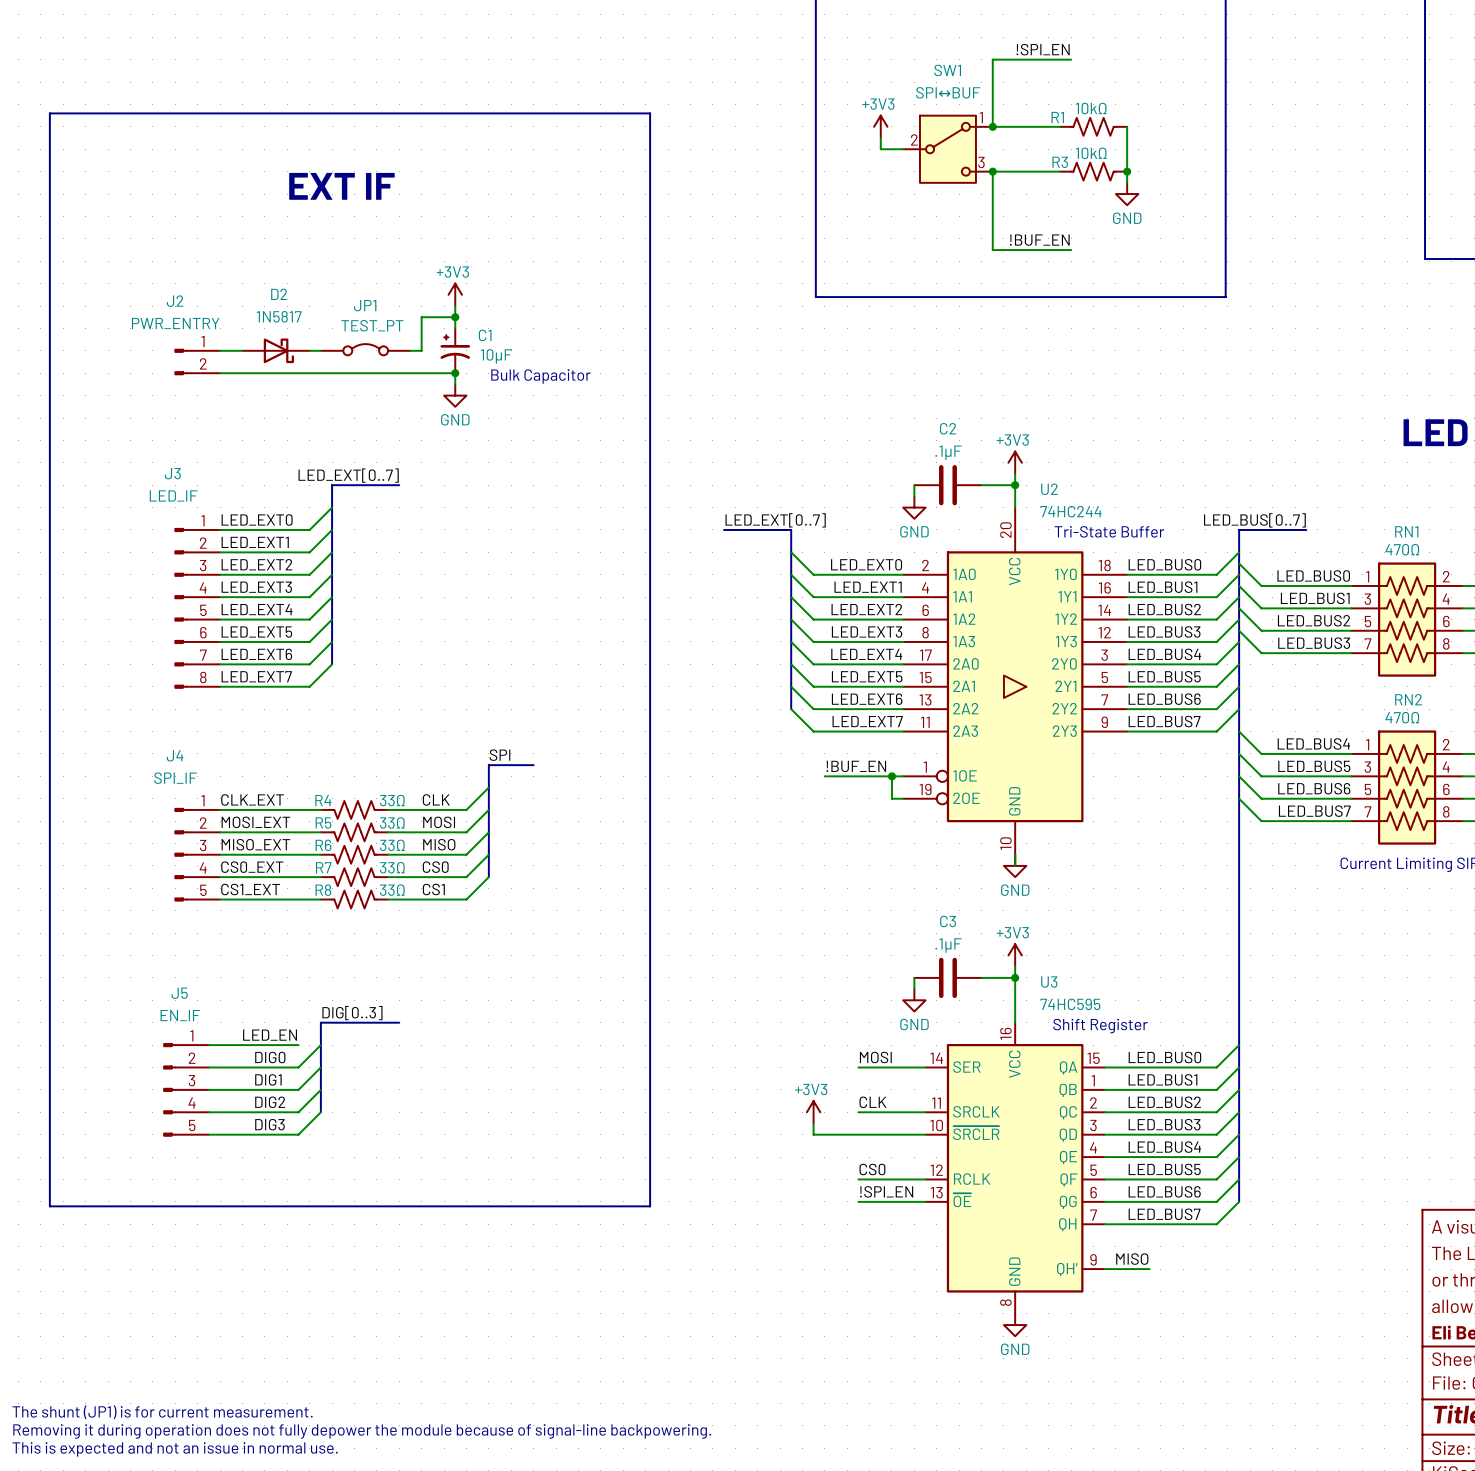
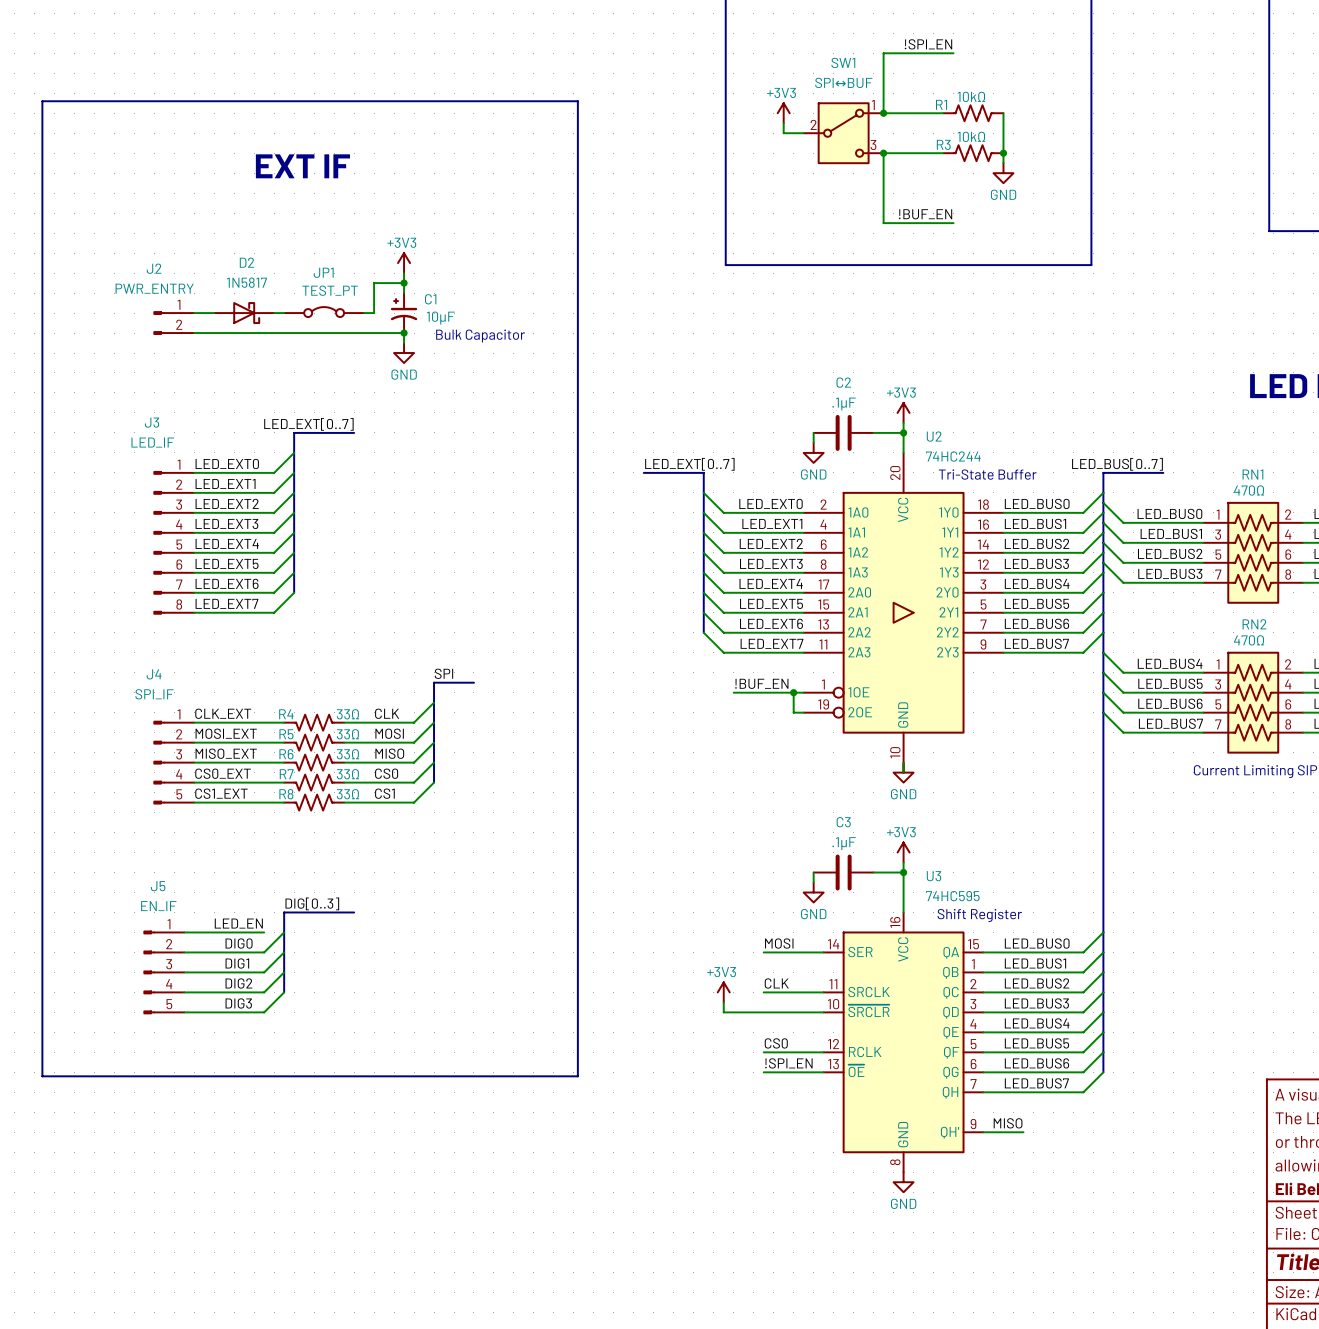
text: The shunt (JP1) is for current measurement. (162, 1412) -> none
text: Removing it during operation does not fully depower the module because of signal-line backpowering. (362, 1431) -> none
text: This is expected and not an issue in normal use. (175, 1449) -> none

